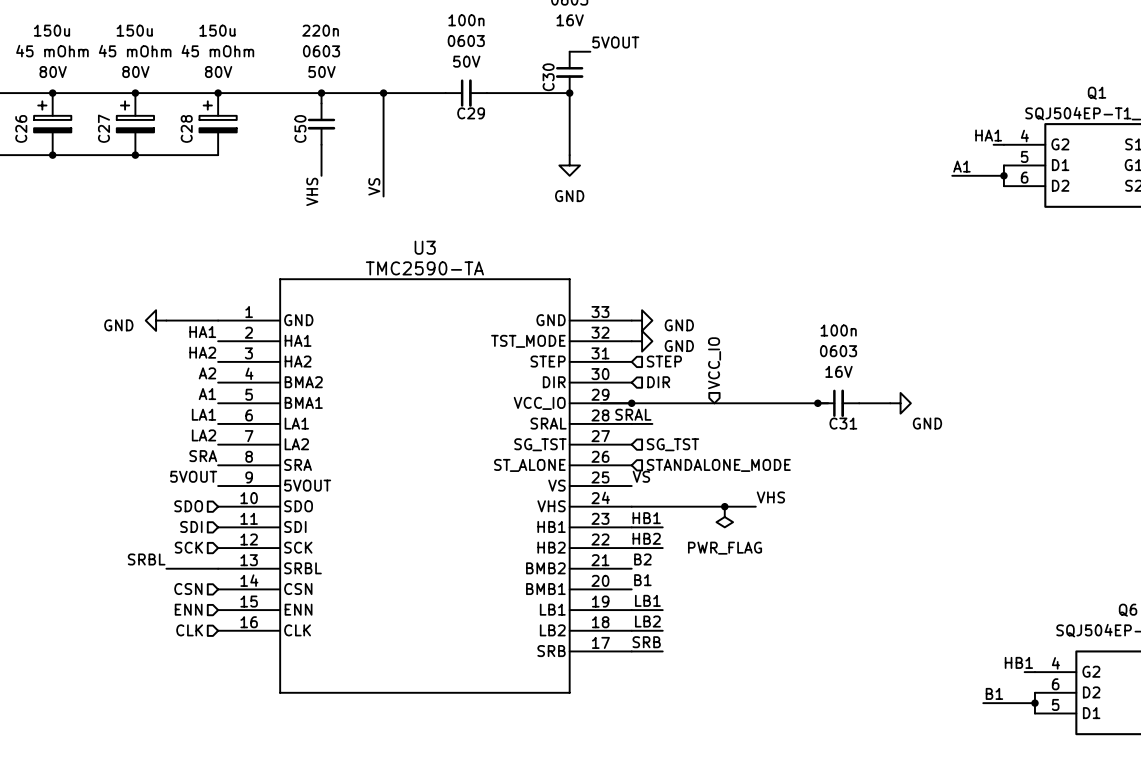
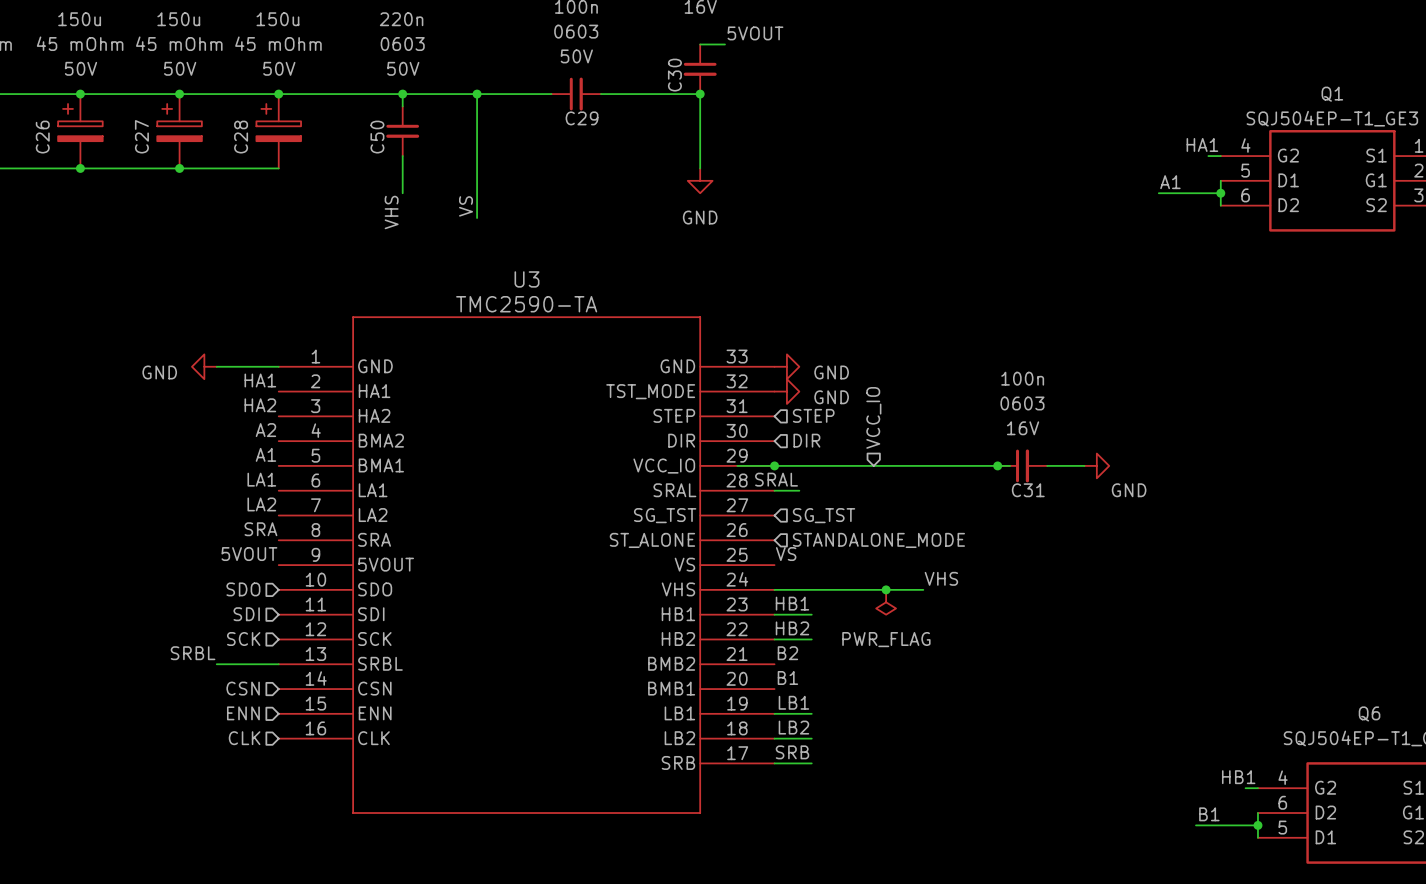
C26 text: 80V (53, 72) -> 50V (81, 68)
C27 text: 80V (135, 72) -> 50V (180, 68)
C28 text: 80V (218, 72) -> 50V (279, 68)

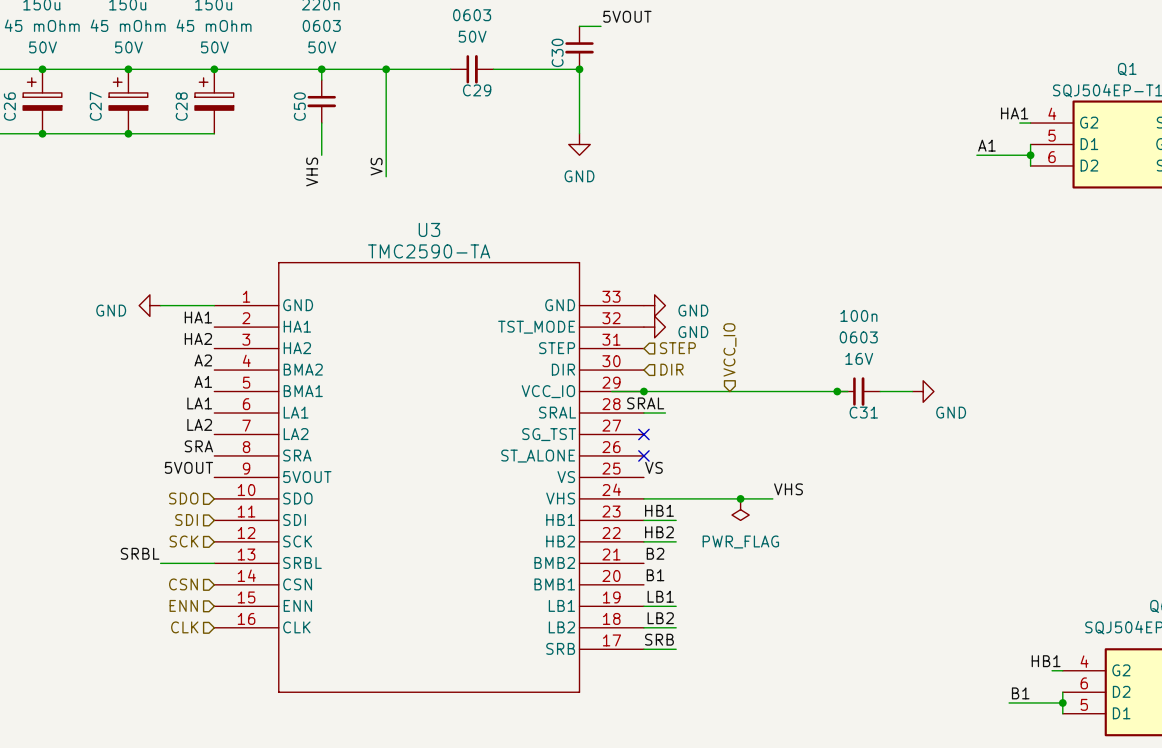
no-connect mark: none -> (643, 434)
hierarchical label: SG_TST (824, 515) -> none
no-connect mark: none -> (643, 455)
hierarchical label: STANDALONE_MODE (878, 540) -> none

